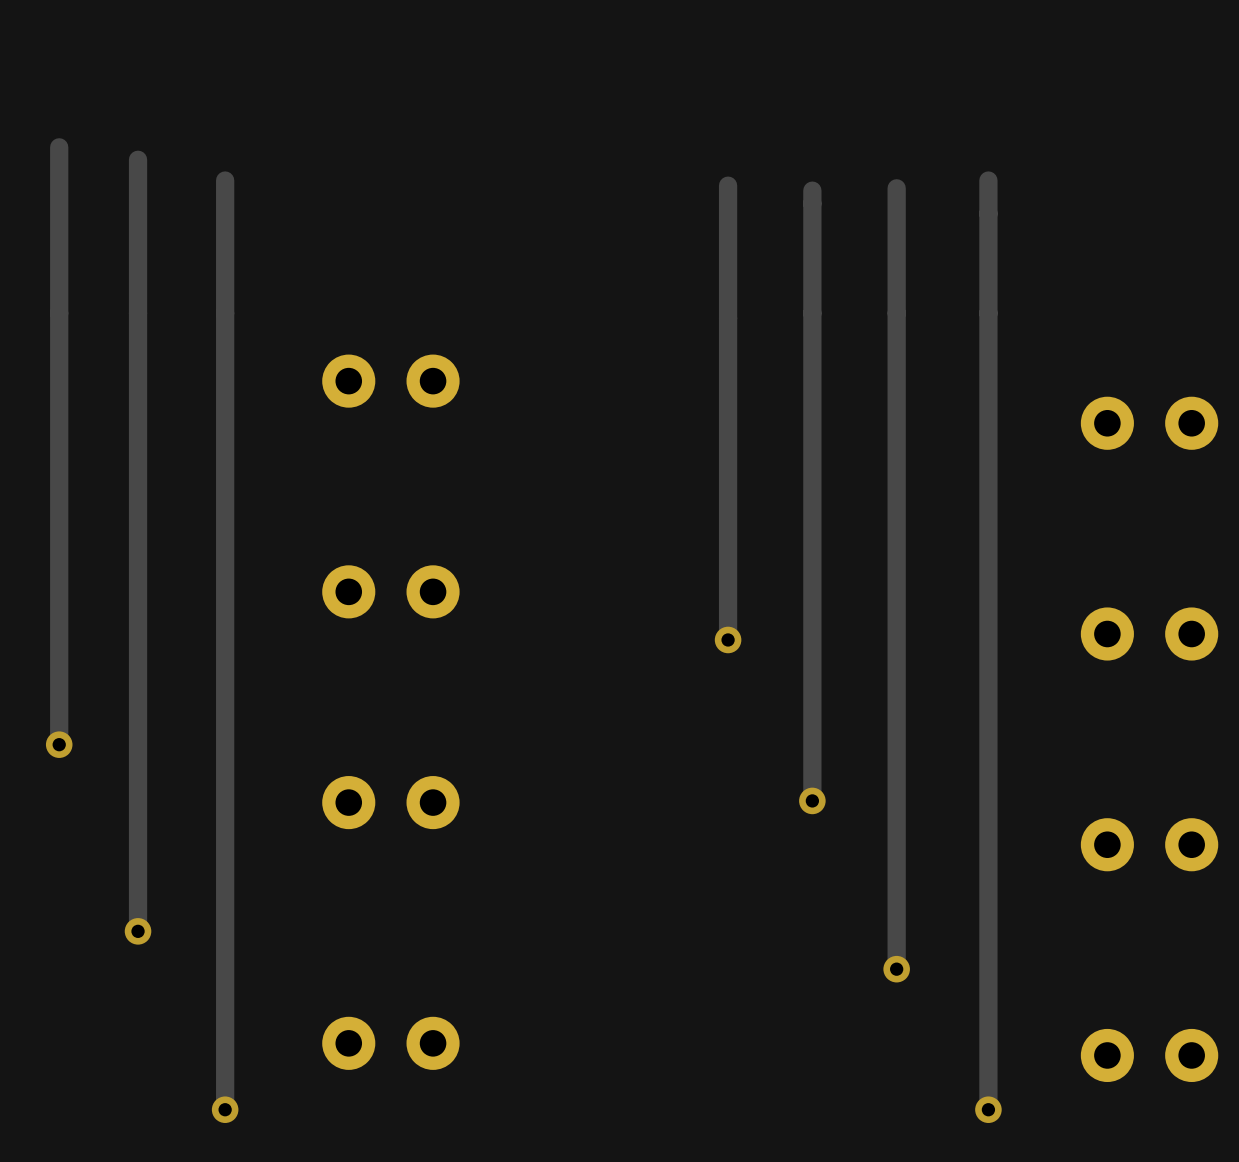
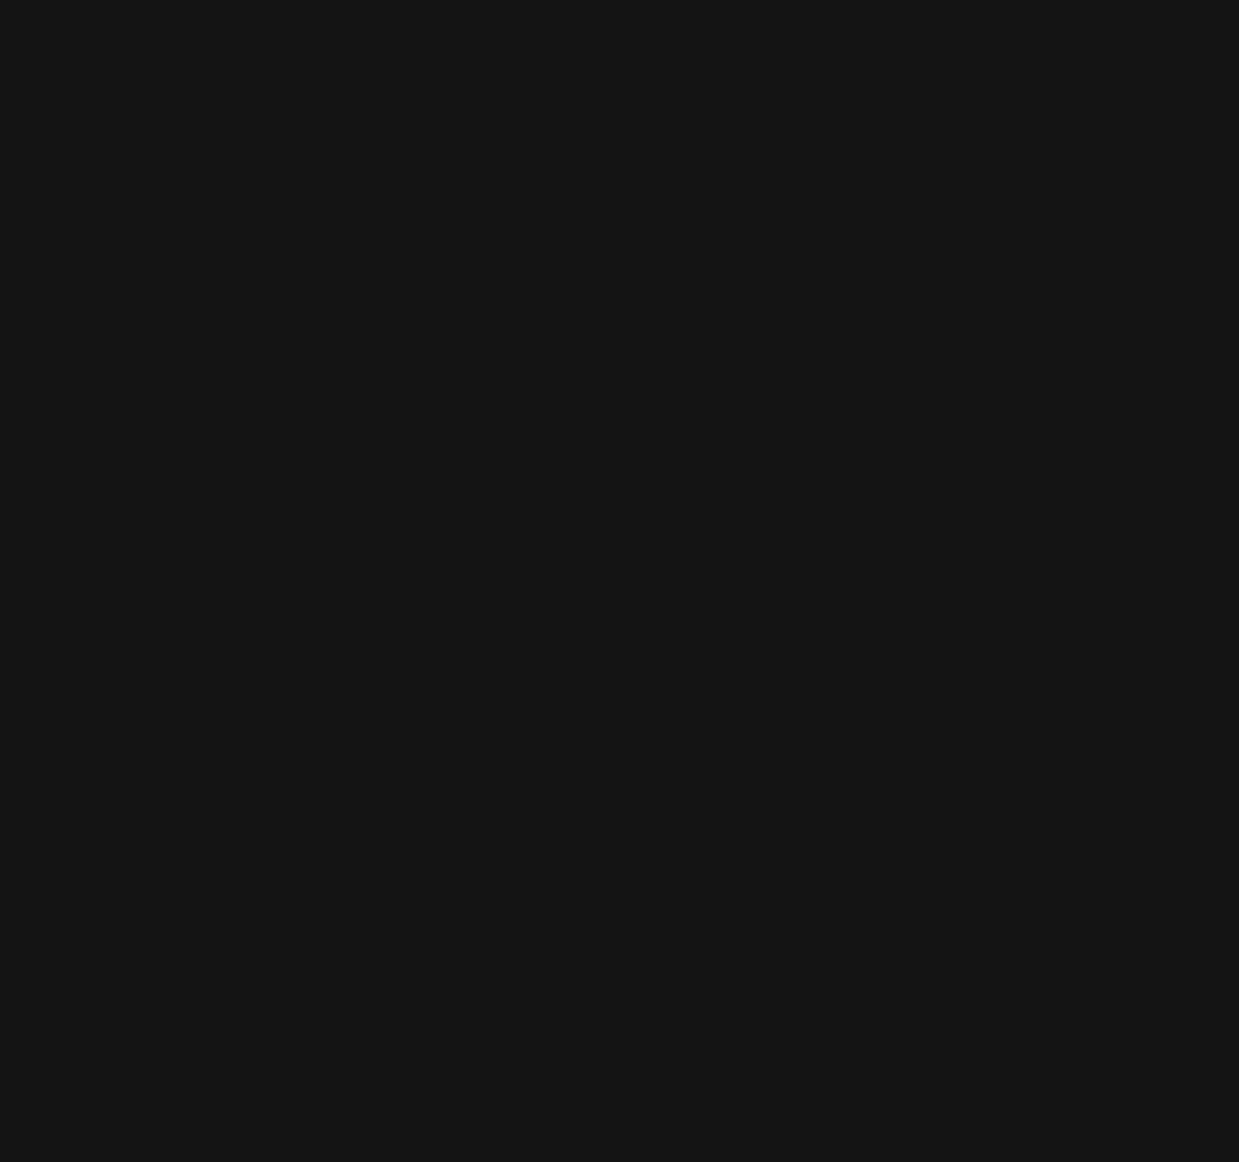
track: (59, 147) (59, 744) -> none
track: (138, 159) (138, 931) -> none
track: (225, 180) (225, 1109) -> none
track: (988, 180) (988, 1109) -> none
track: (728, 185) (728, 639) -> none
track: (896, 188) (896, 969) -> none
track: (812, 190) (812, 800) -> none
part: (390, 381) -> none
part: (1149, 423) -> none
part: (390, 591) -> none
part: (1149, 634) -> none
via: (728, 639) -> none
via: (59, 744) -> none
via: (812, 800) -> none
part: (390, 802) -> none
part: (1149, 844) -> none
via: (138, 931) -> none
via: (896, 969) -> none
part: (390, 1043) -> none
part: (1149, 1055) -> none
via: (225, 1109) -> none
via: (988, 1109) -> none

